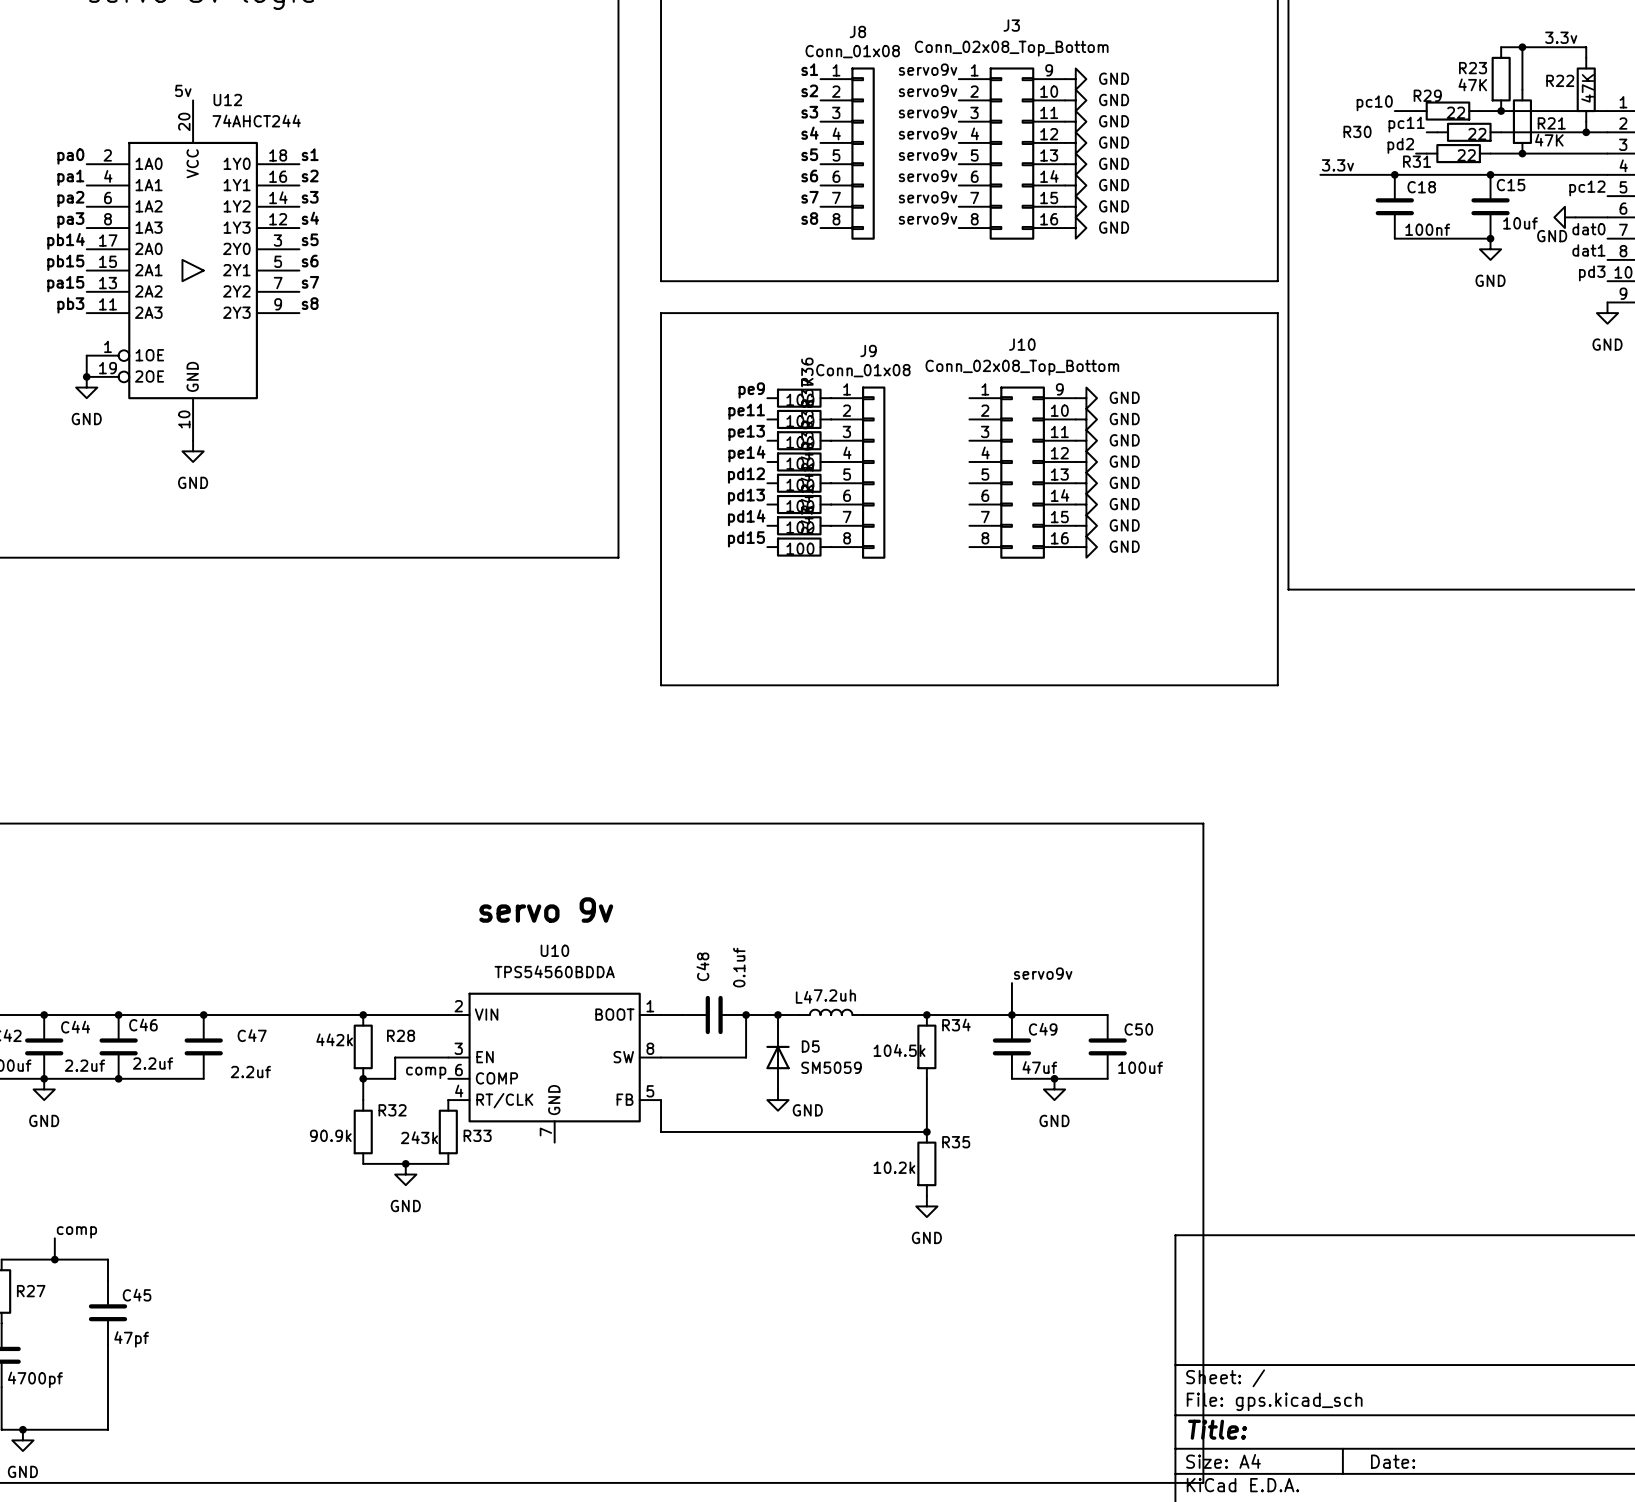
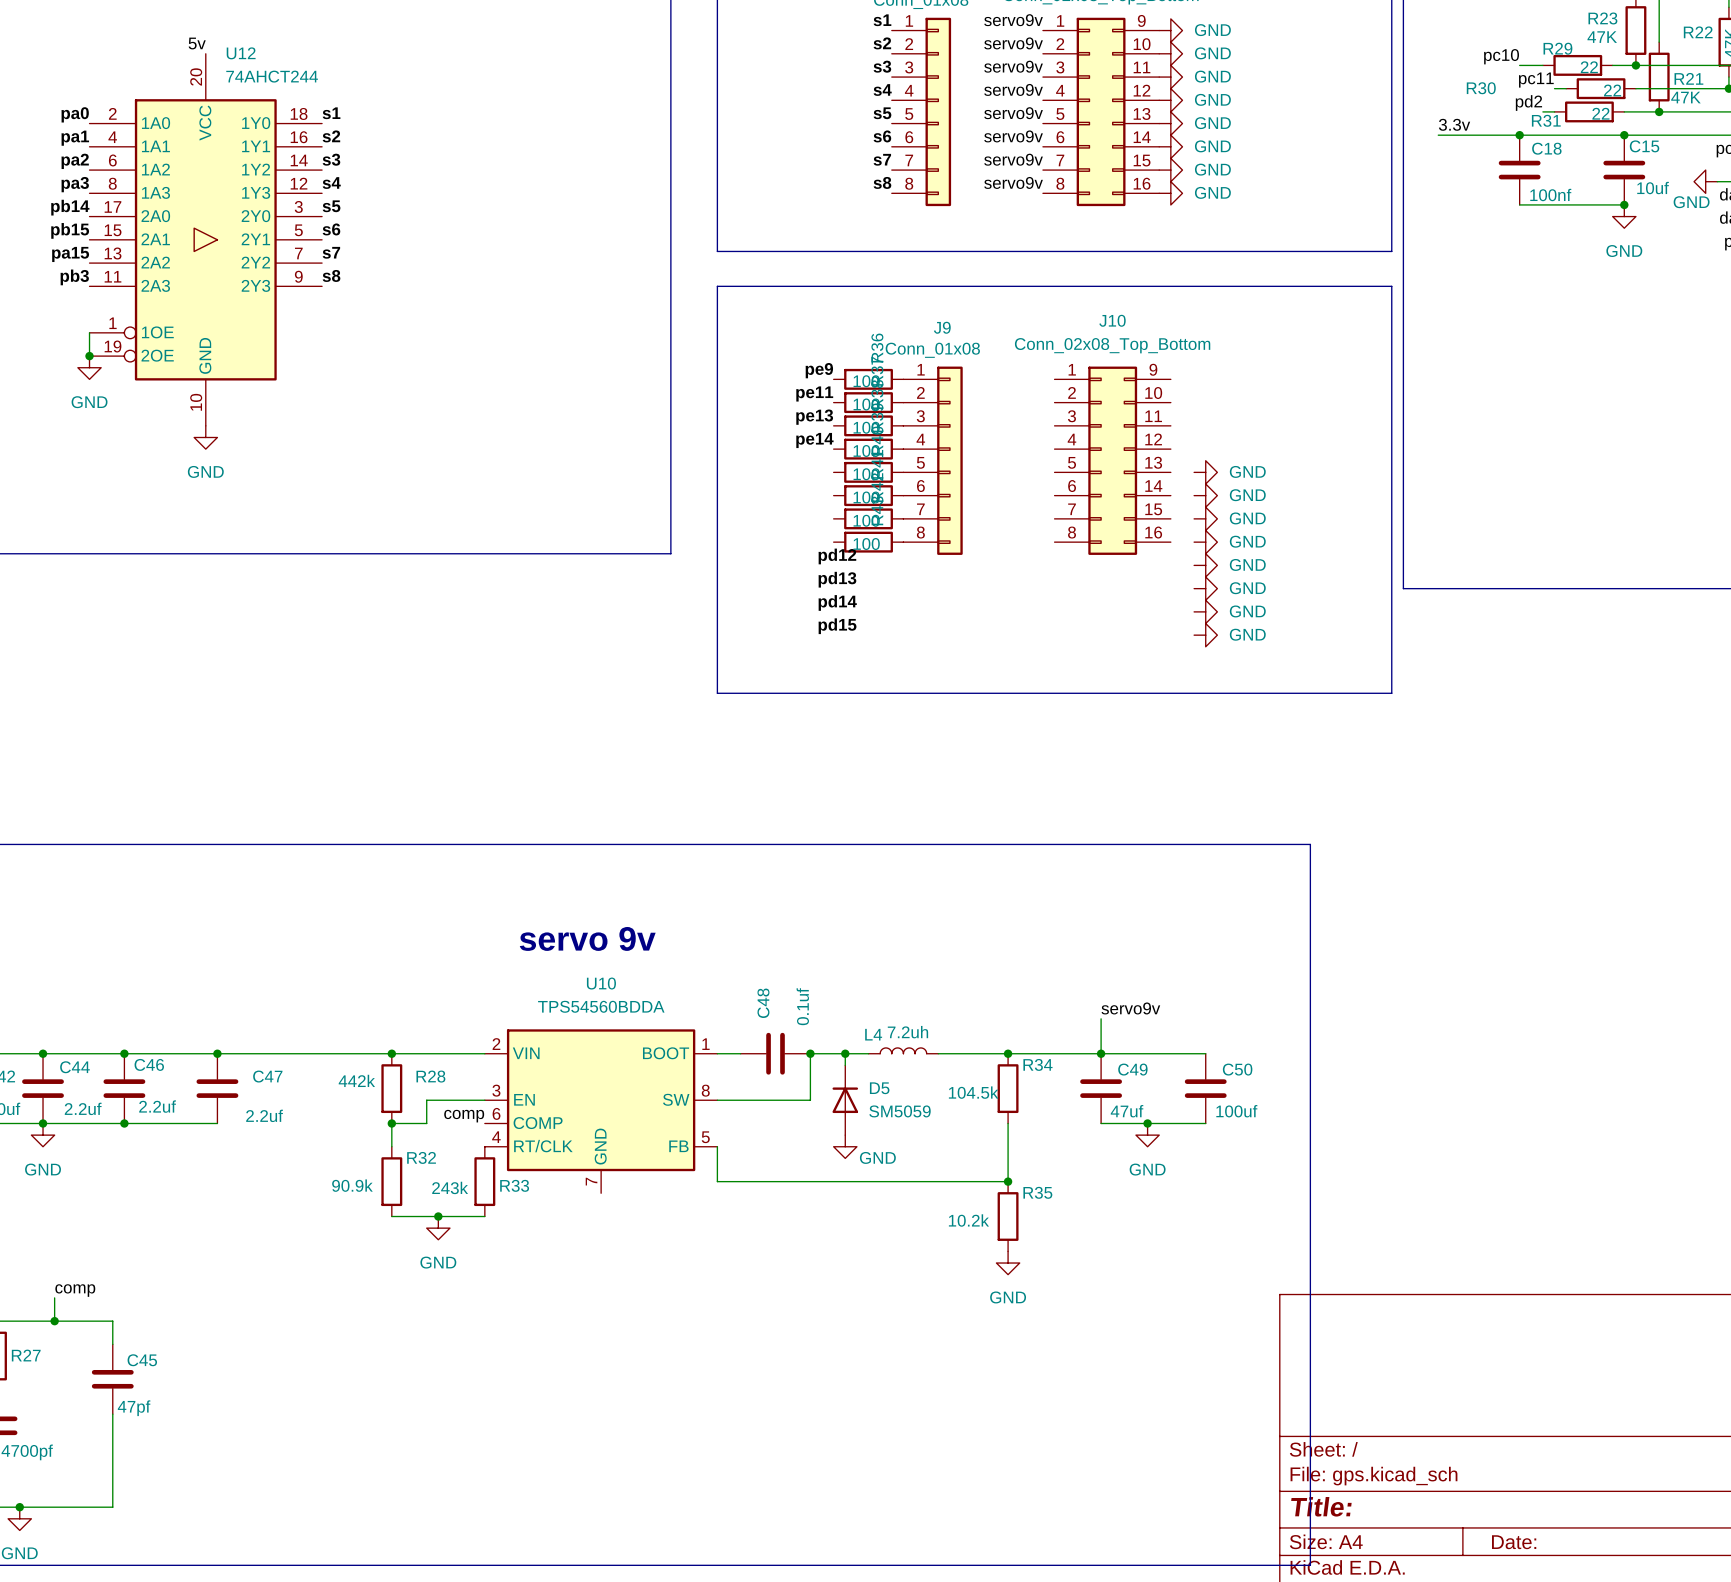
power symbol: GND (1086, 398) -> none
power symbol: GND (1086, 419) -> none
power symbol: GND (1086, 440) -> none
power symbol: GND (1086, 461) -> none
label position: pd12 (746, 475) -> pd12 (837, 556)
power symbol: GND (1086, 483) -> none
power symbol: none -> GND (1205, 472)
label position: pd13 (746, 496) -> pd13 (837, 579)
power symbol: GND (1086, 504) -> none
power symbol: none -> GND (1205, 495)
label position: pd14 (746, 517) -> pd14 (837, 602)
power symbol: GND (1086, 525) -> none
power symbol: none -> GND (1205, 518)
label position: pd15 (746, 539) -> pd15 (837, 626)
power symbol: GND (1086, 547) -> none
power symbol: none -> GND (1205, 542)
power symbol: none -> GND (1205, 565)
power symbol: none -> GND (1205, 588)
power symbol: none -> GND (1205, 611)
power symbol: none -> GND (1205, 635)

